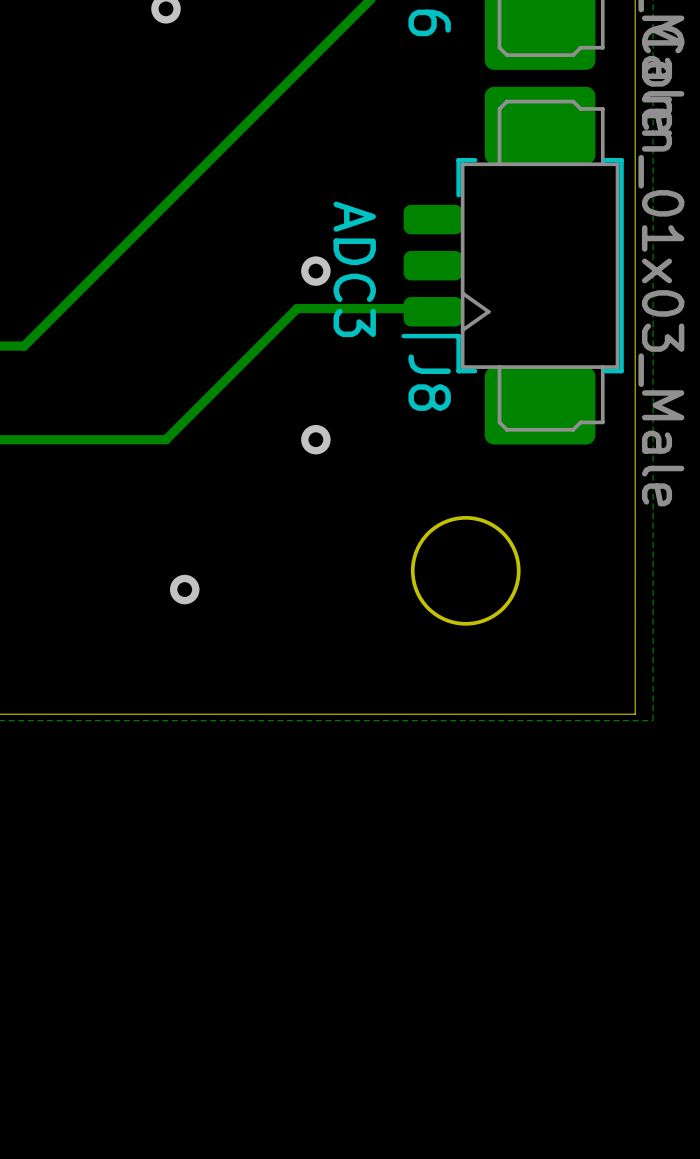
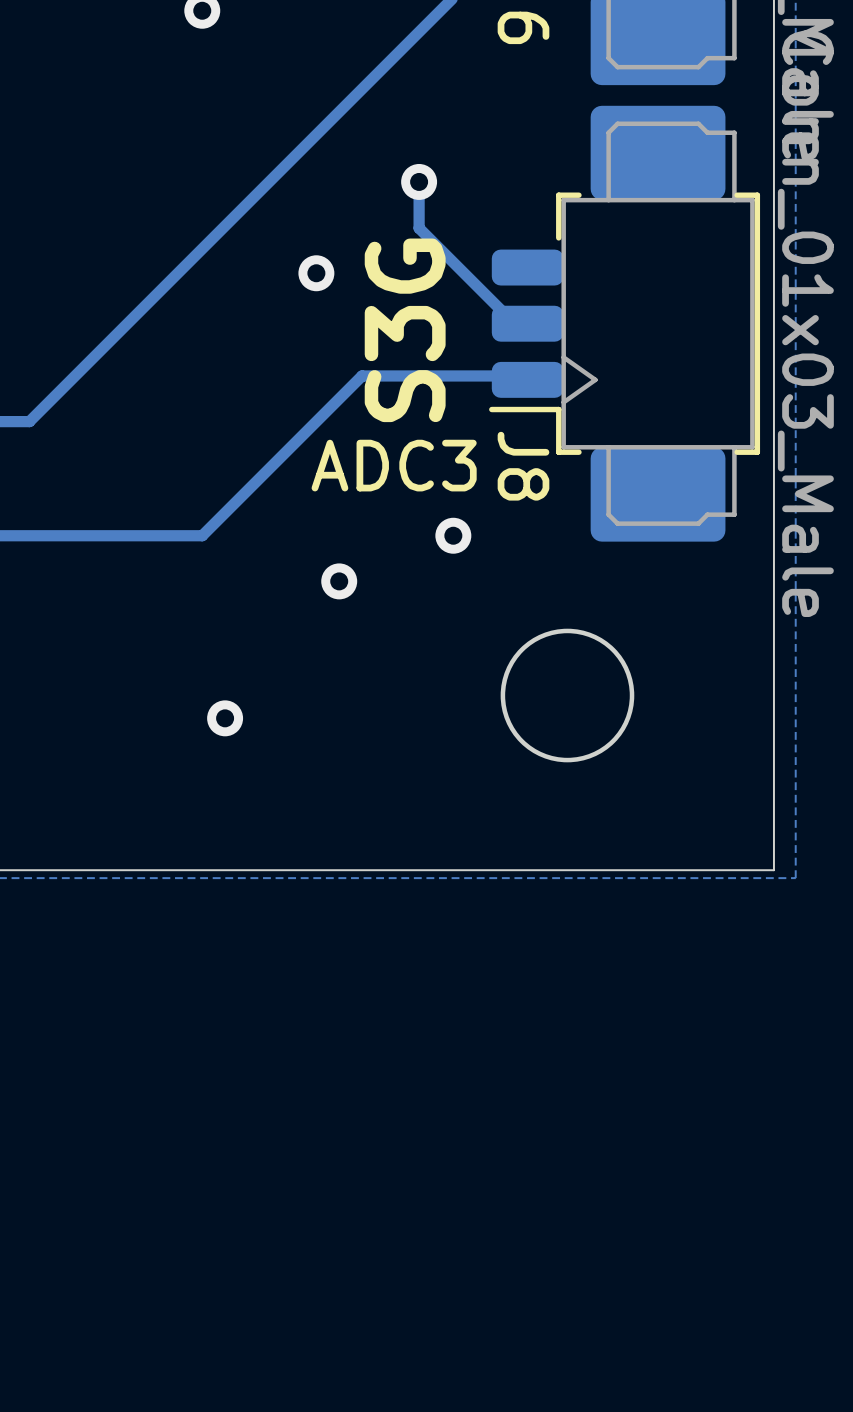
track: none -> (419, 181) (419, 228) (514, 323) (527, 323)
via: none -> (419, 181)
via: none -> (316, 273)
text rotation: 0° (354, 269) -> 90° counterclockwise (394, 465)
via: (315, 271) -> none
text: none -> S3G (405, 330)
via: (315, 439) -> none
via: none -> (453, 535)
via: none -> (339, 581)

